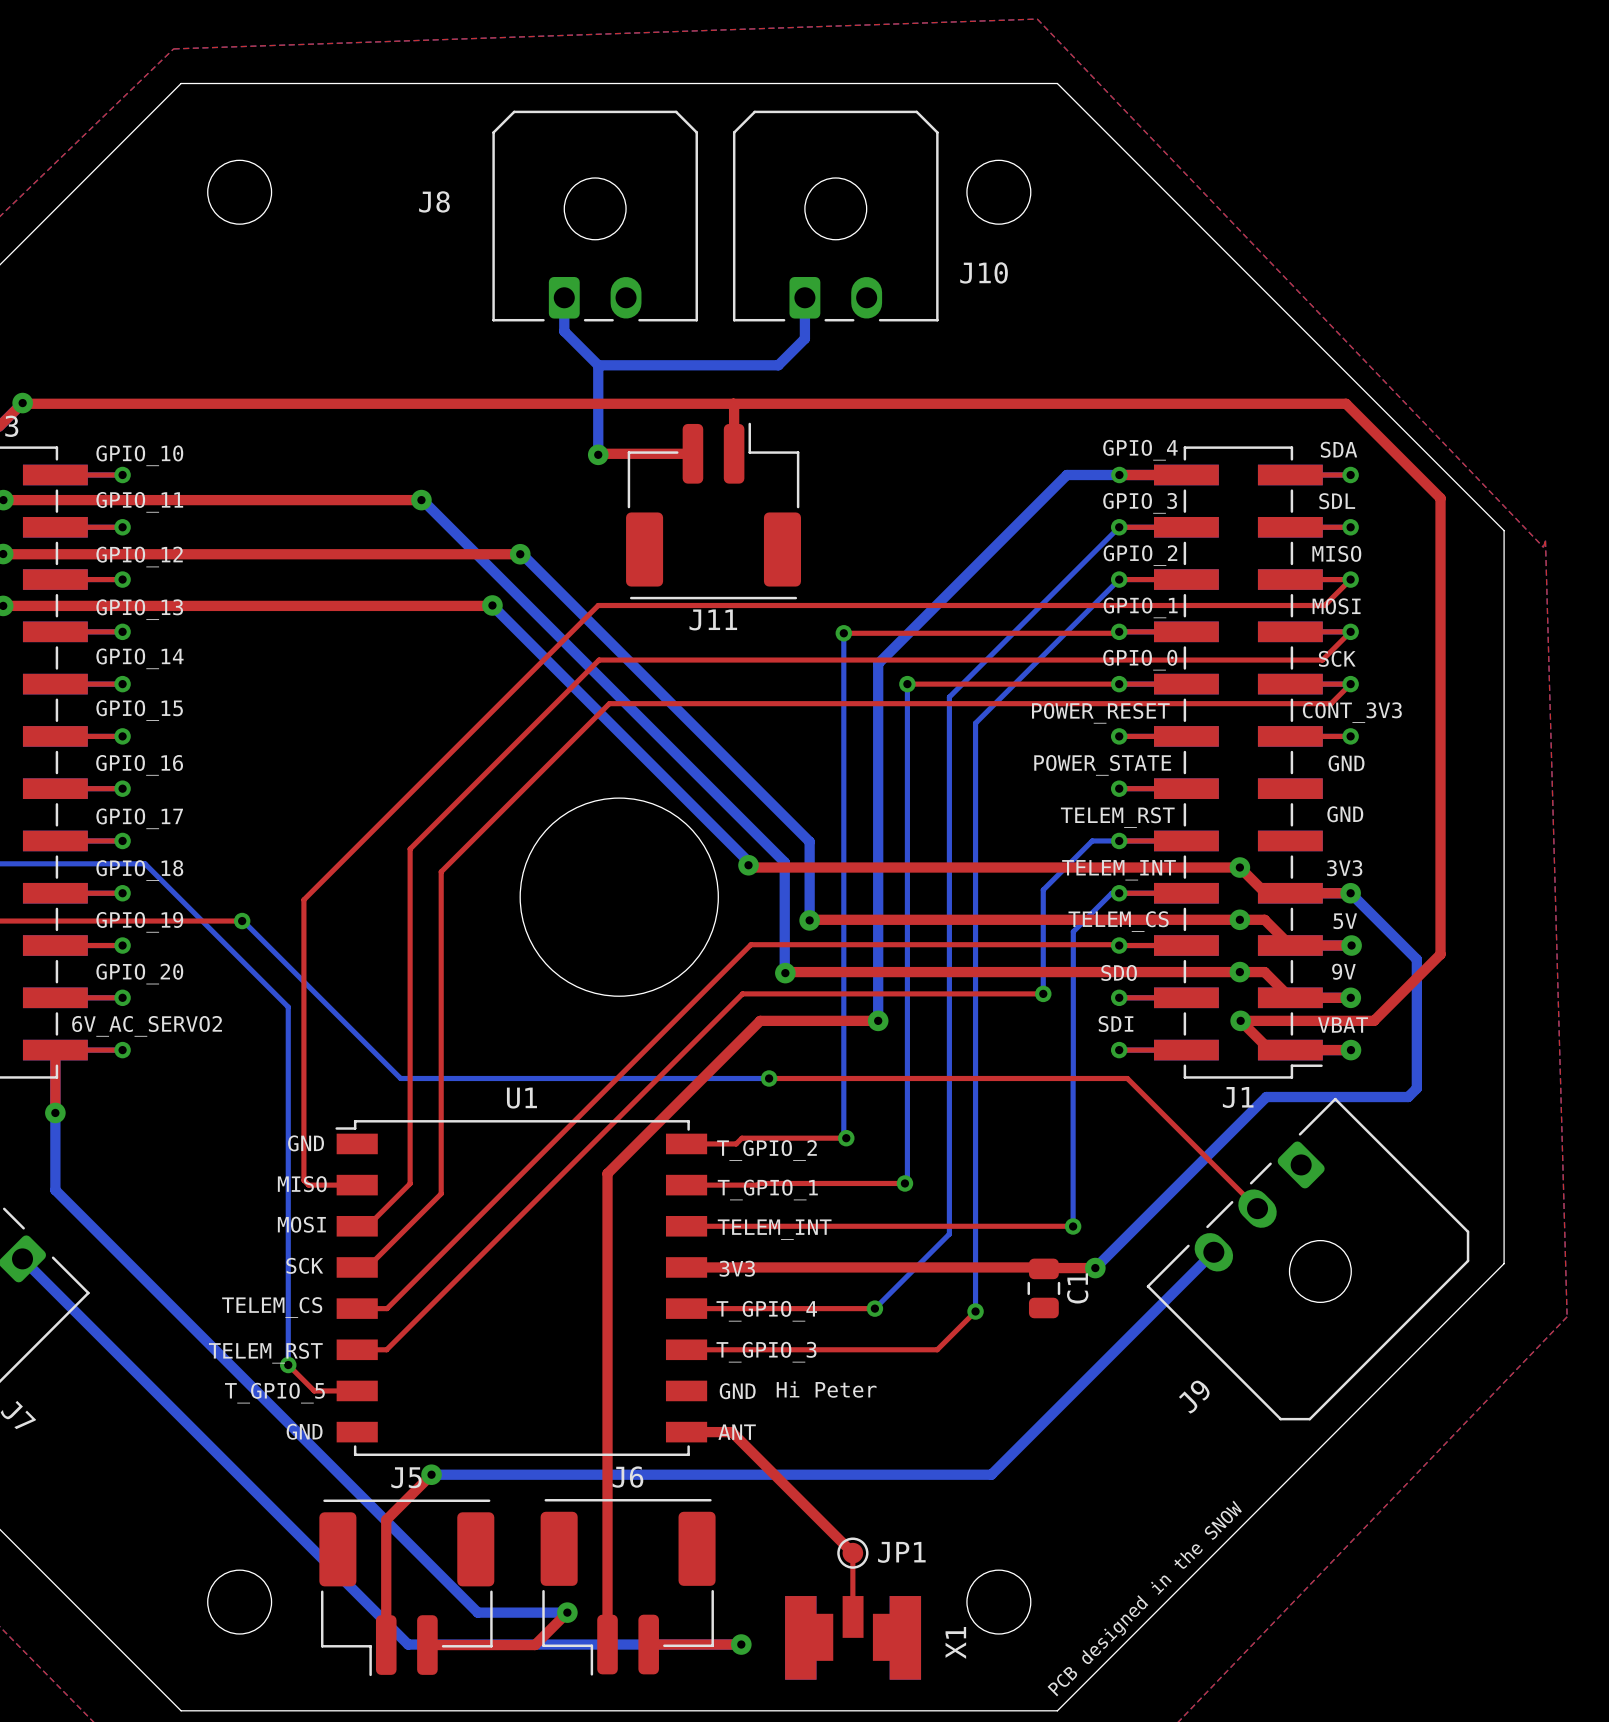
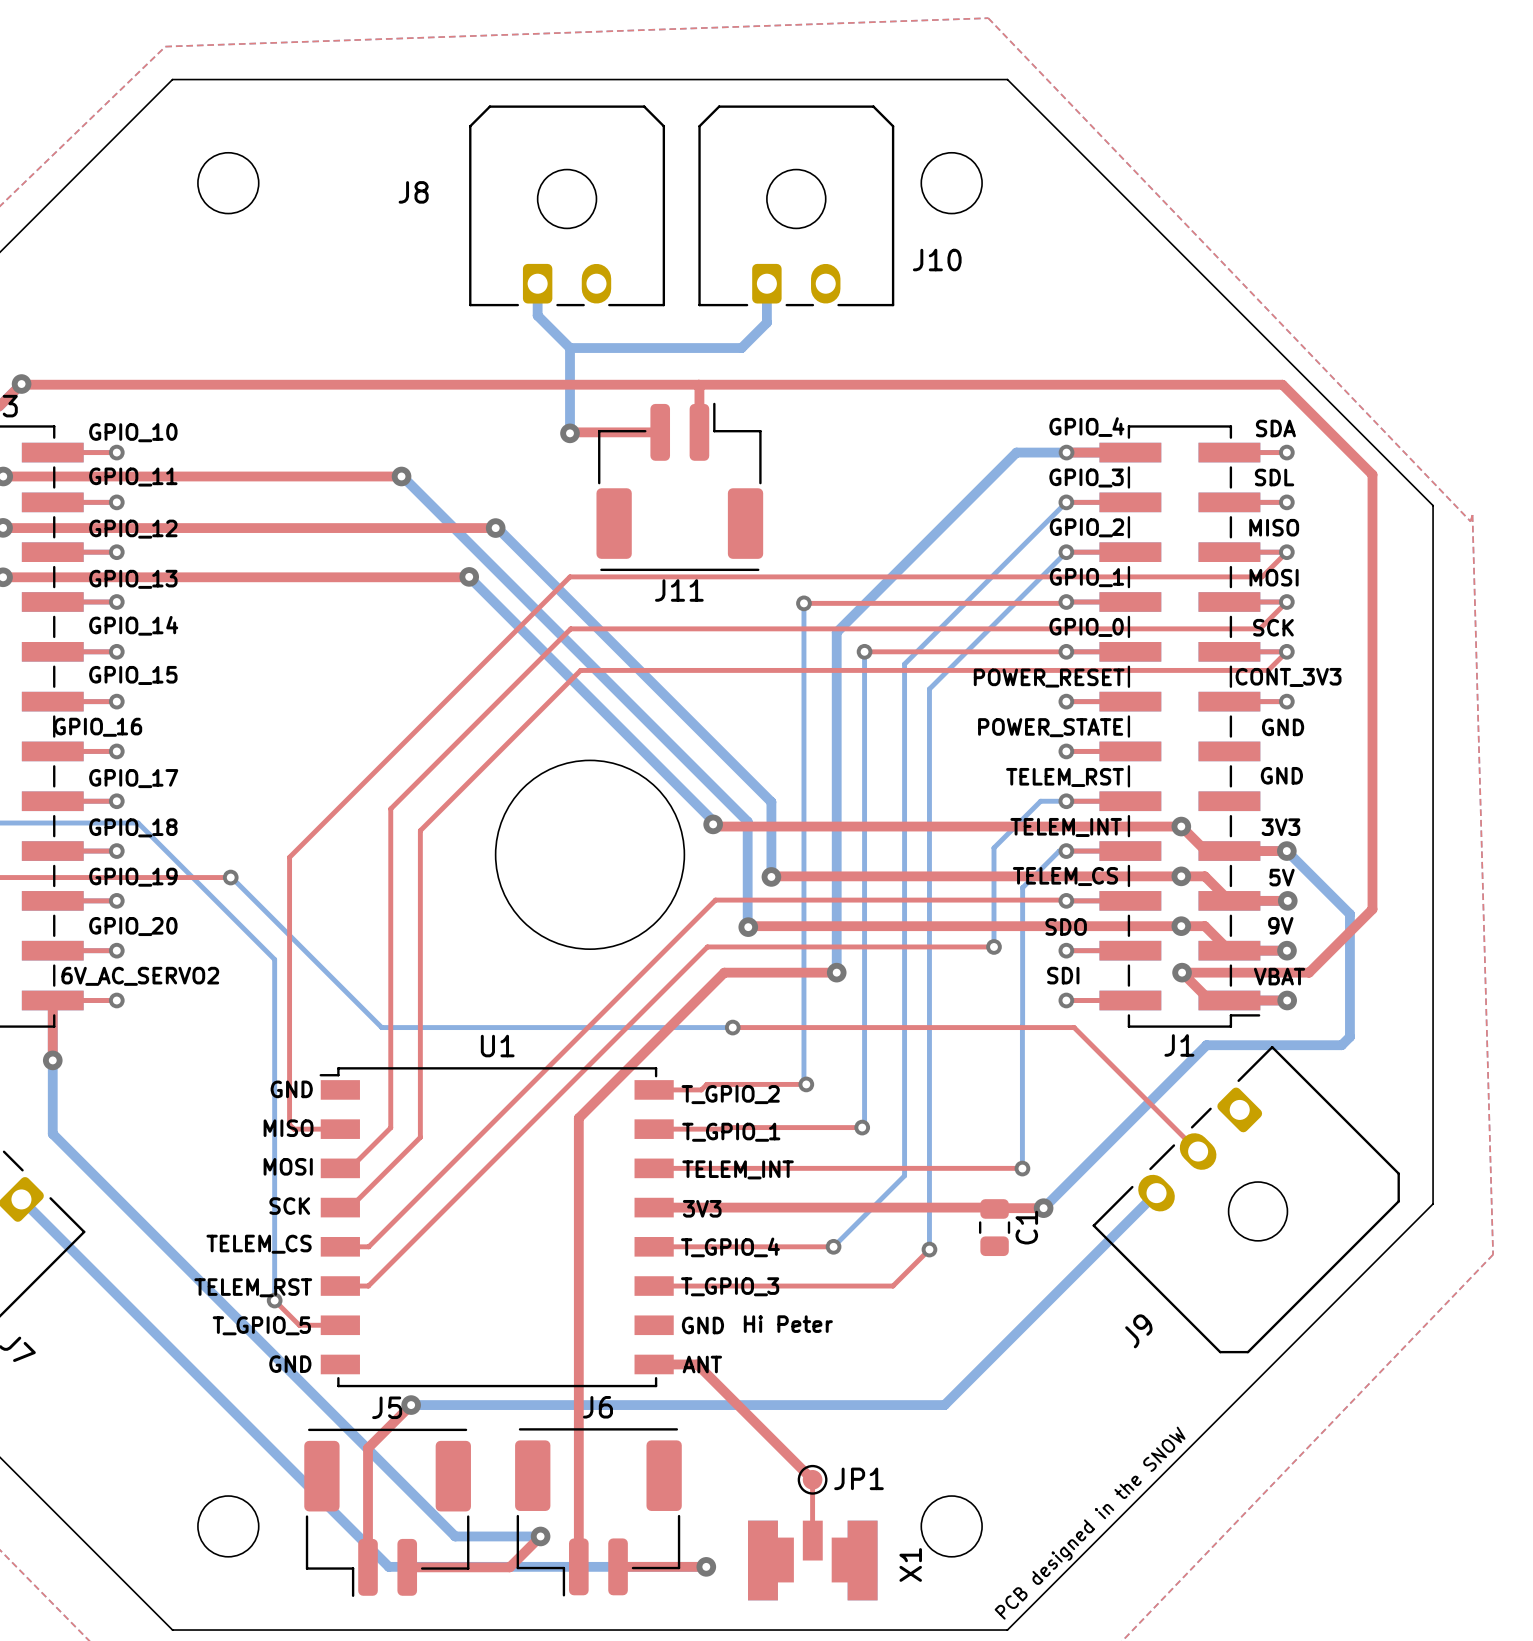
text position: GPIO_16 (139, 765) -> GPIO_16 (97, 727)

